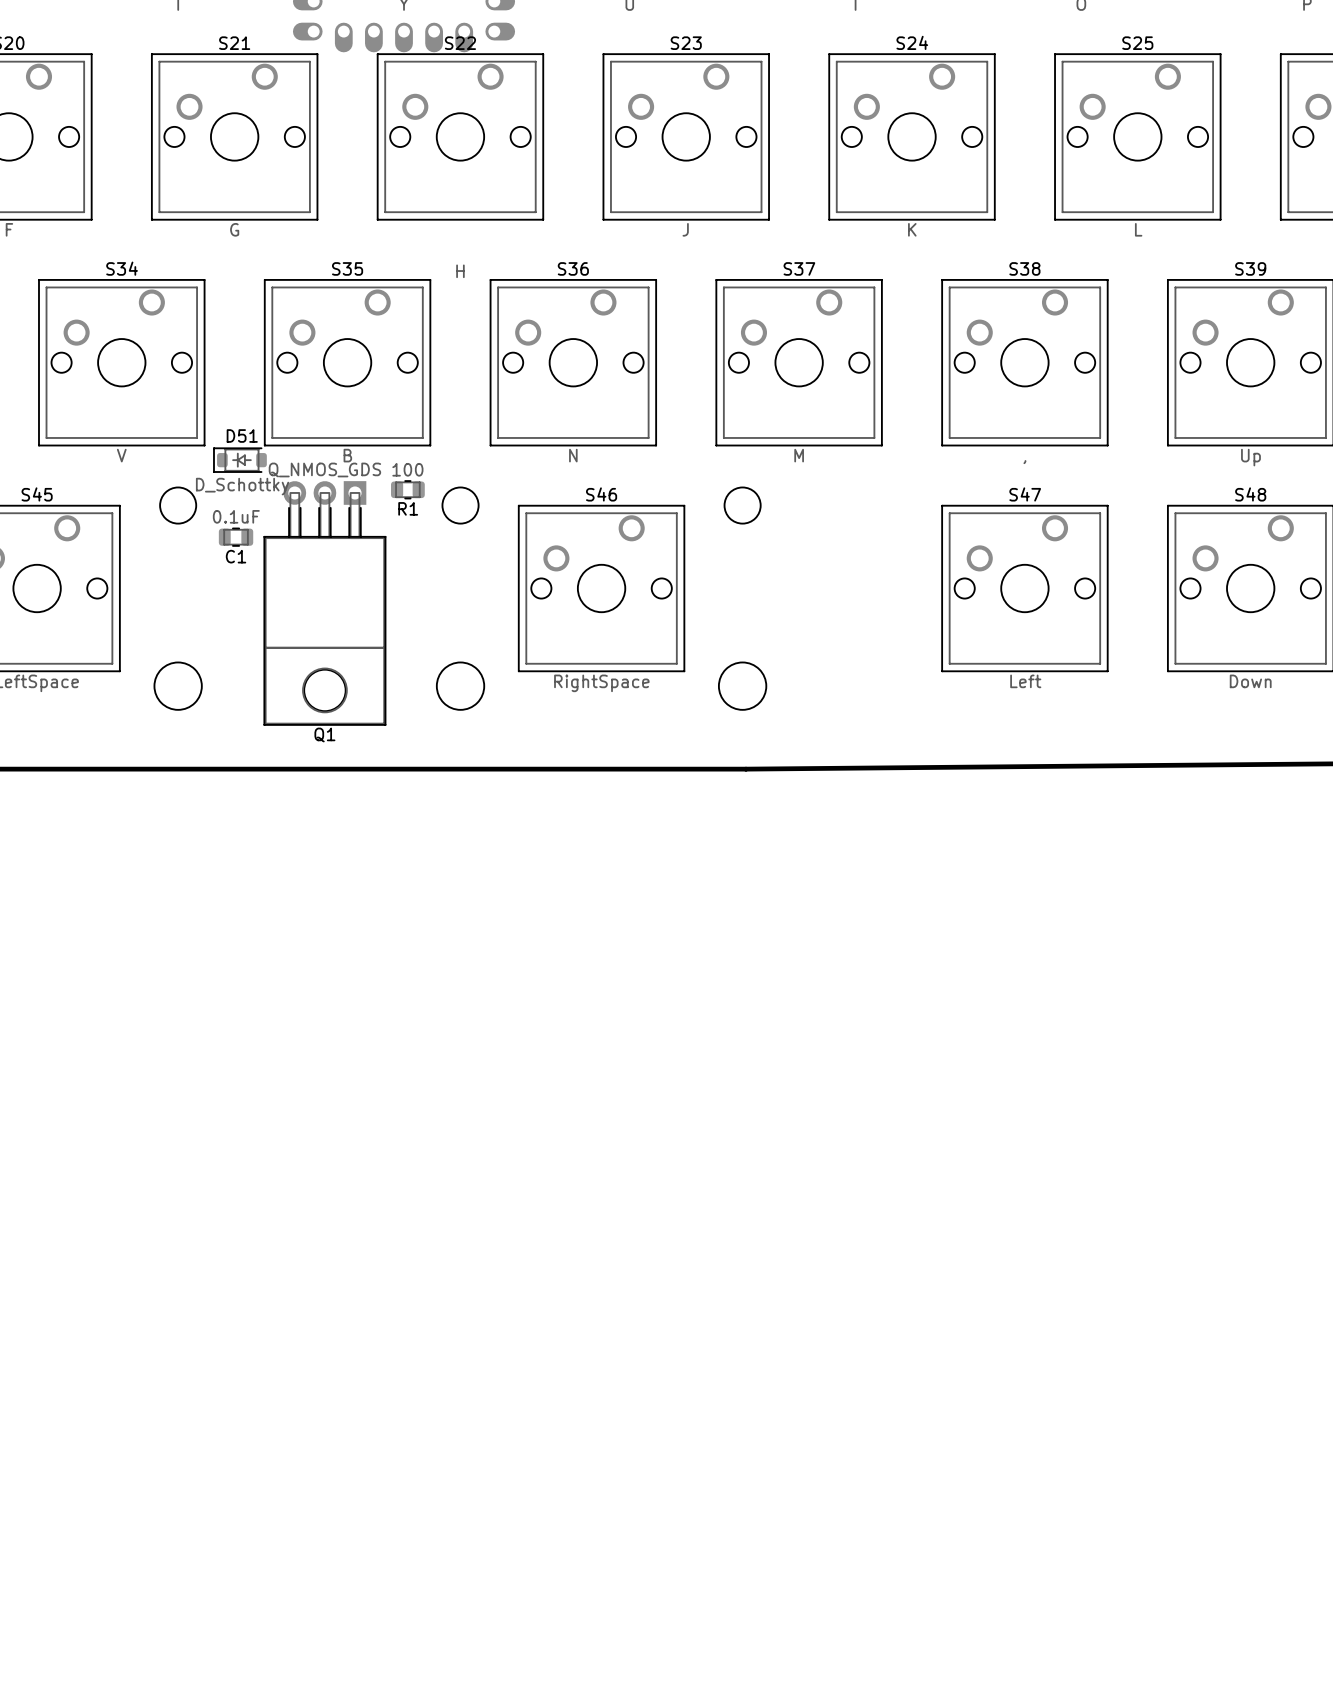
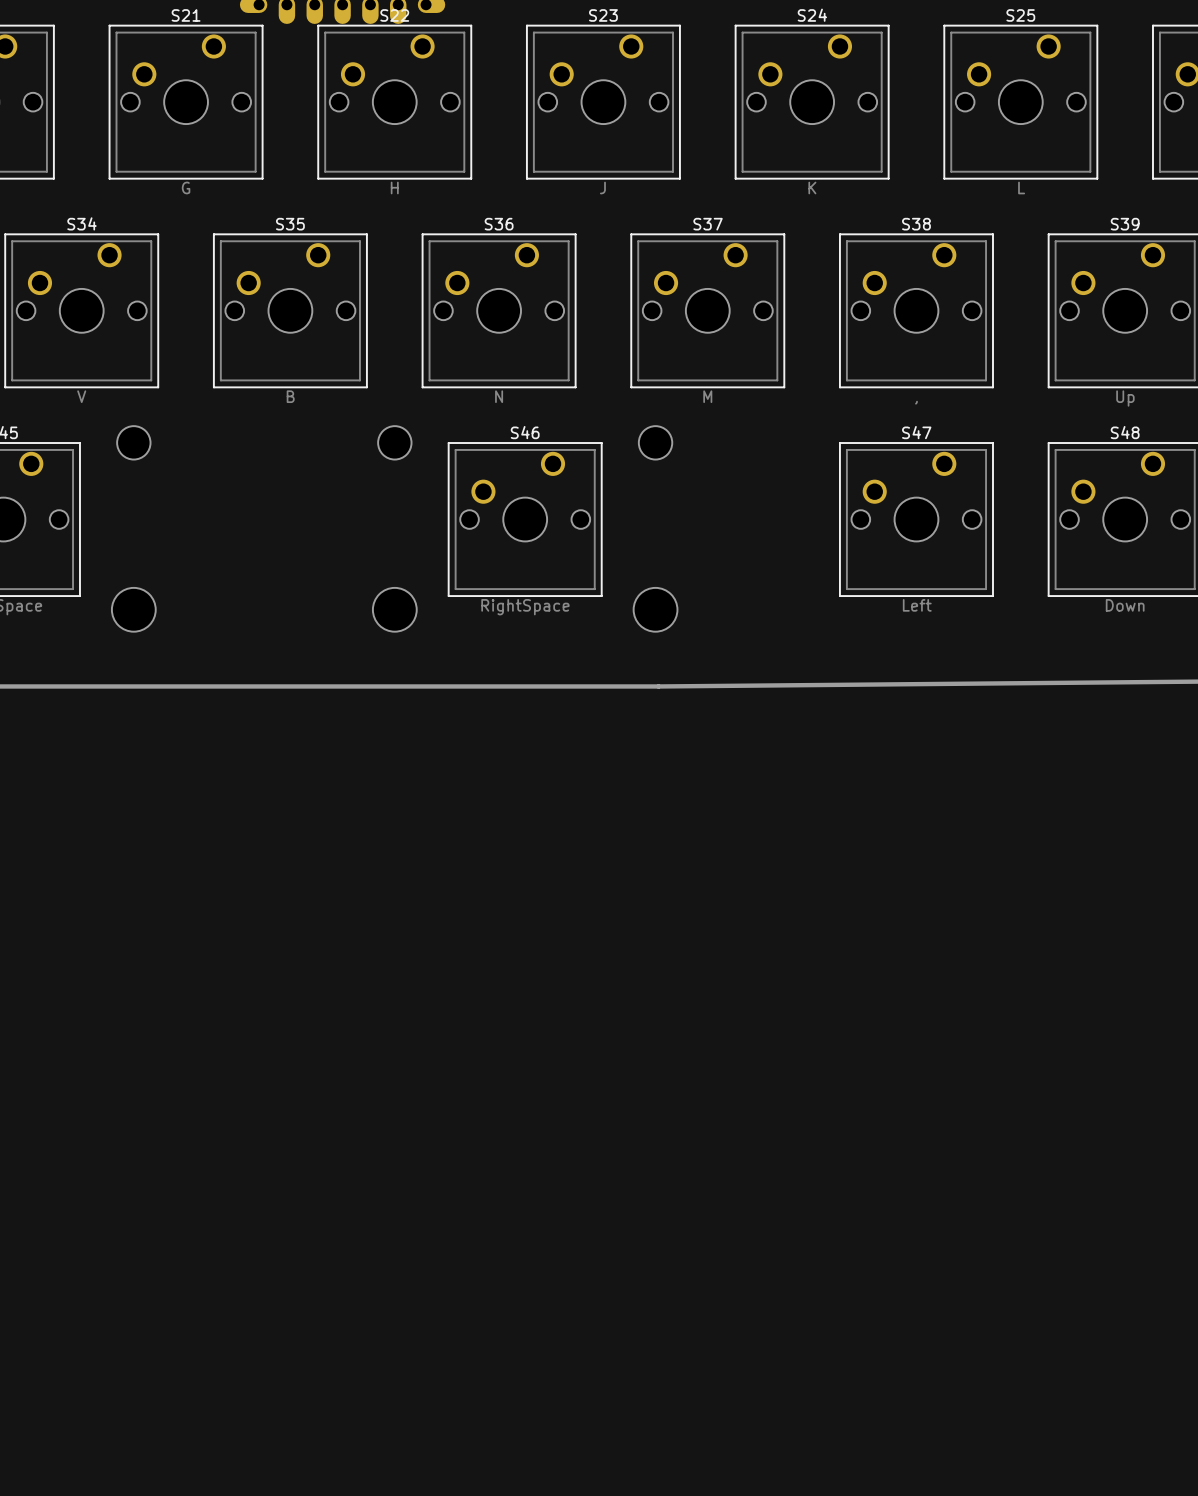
S22 value position: H (460, 271) -> H (394, 187)
D51: D_Schottky (240, 460) -> none
R1: 100 (407, 489) -> none
C1: 0.1uF (236, 537) -> none
Q1: Q_NMOS_GDS (324, 603) -> none

